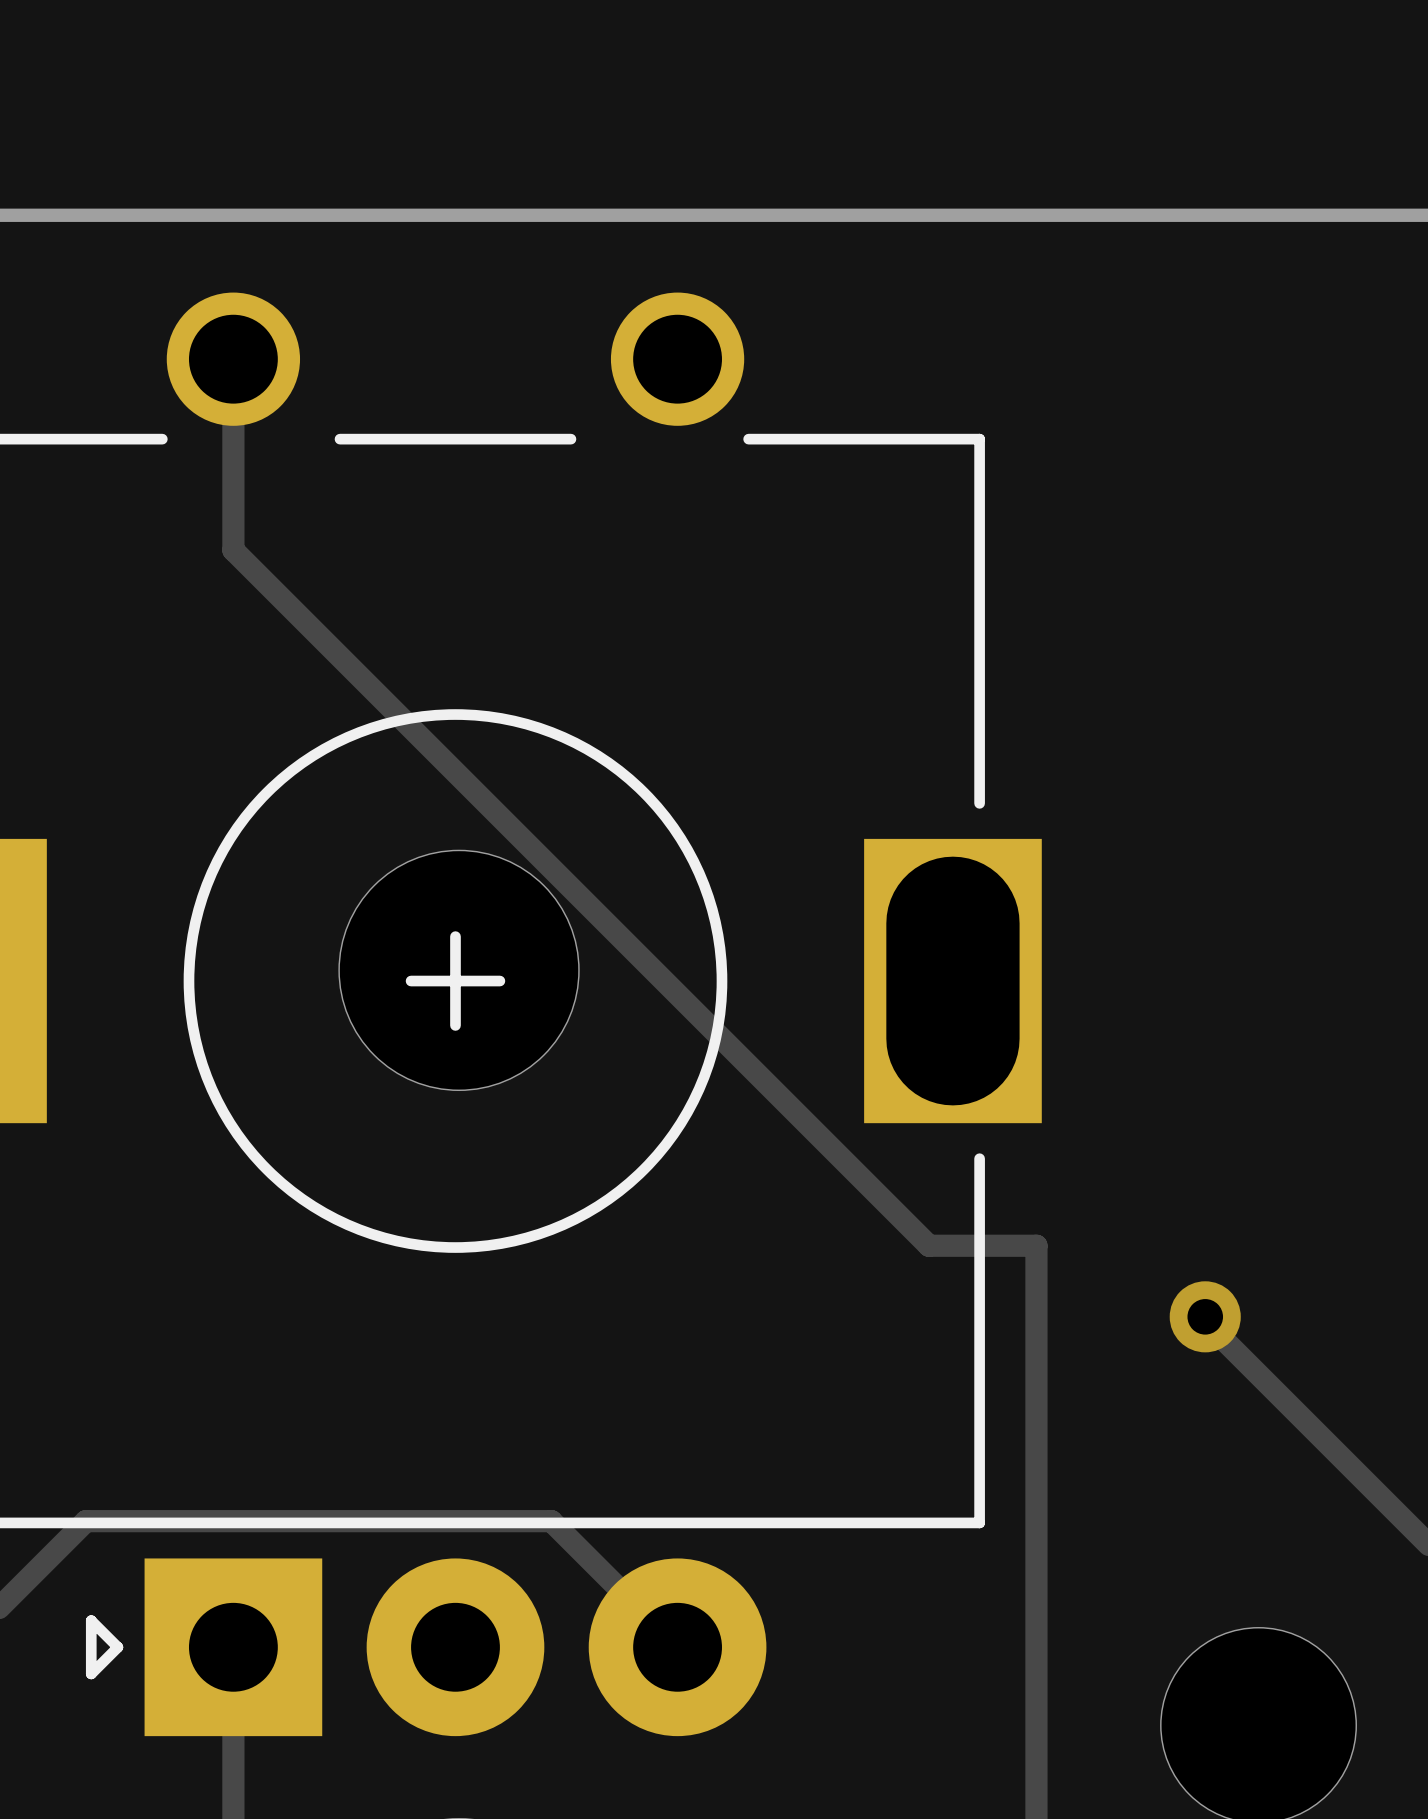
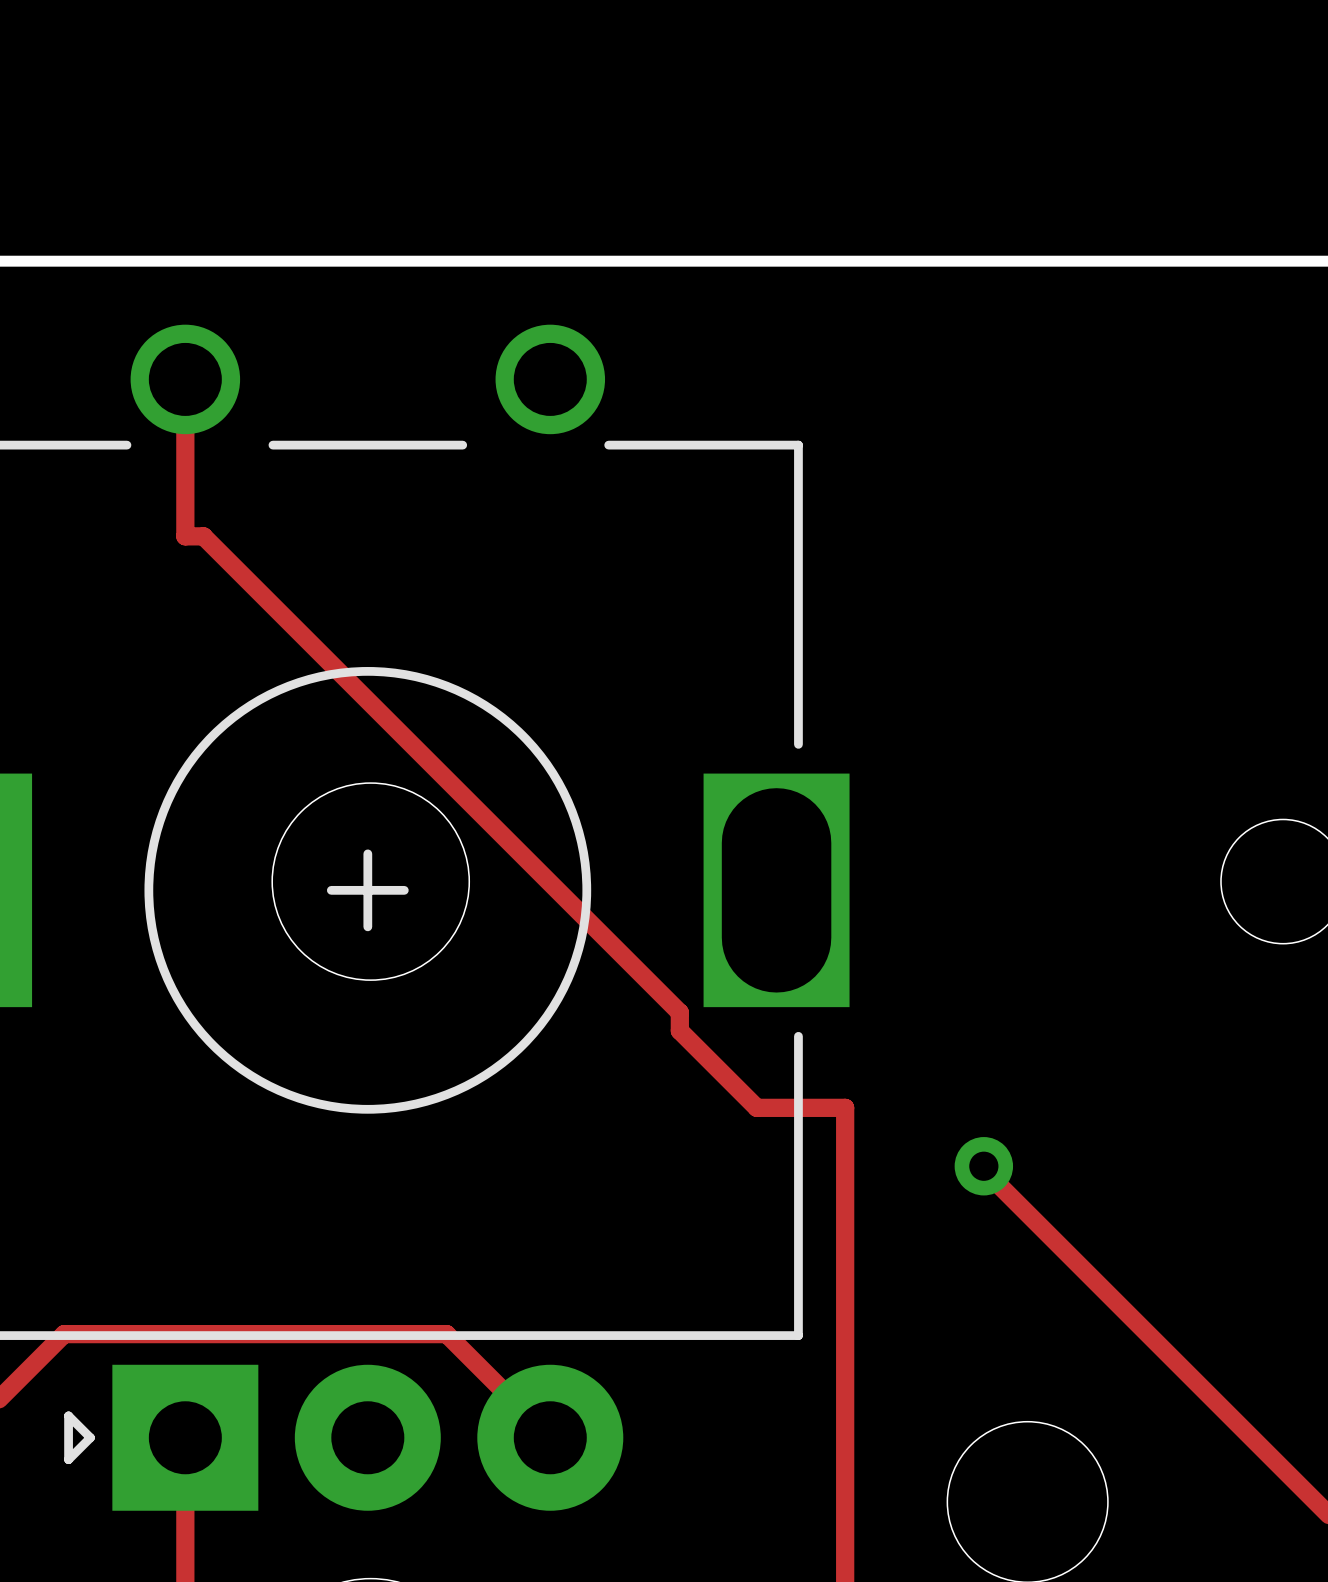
track: (233, 550) (835, 1152) -> (185, 536) (203, 536) (679, 1012) (679, 1030)

